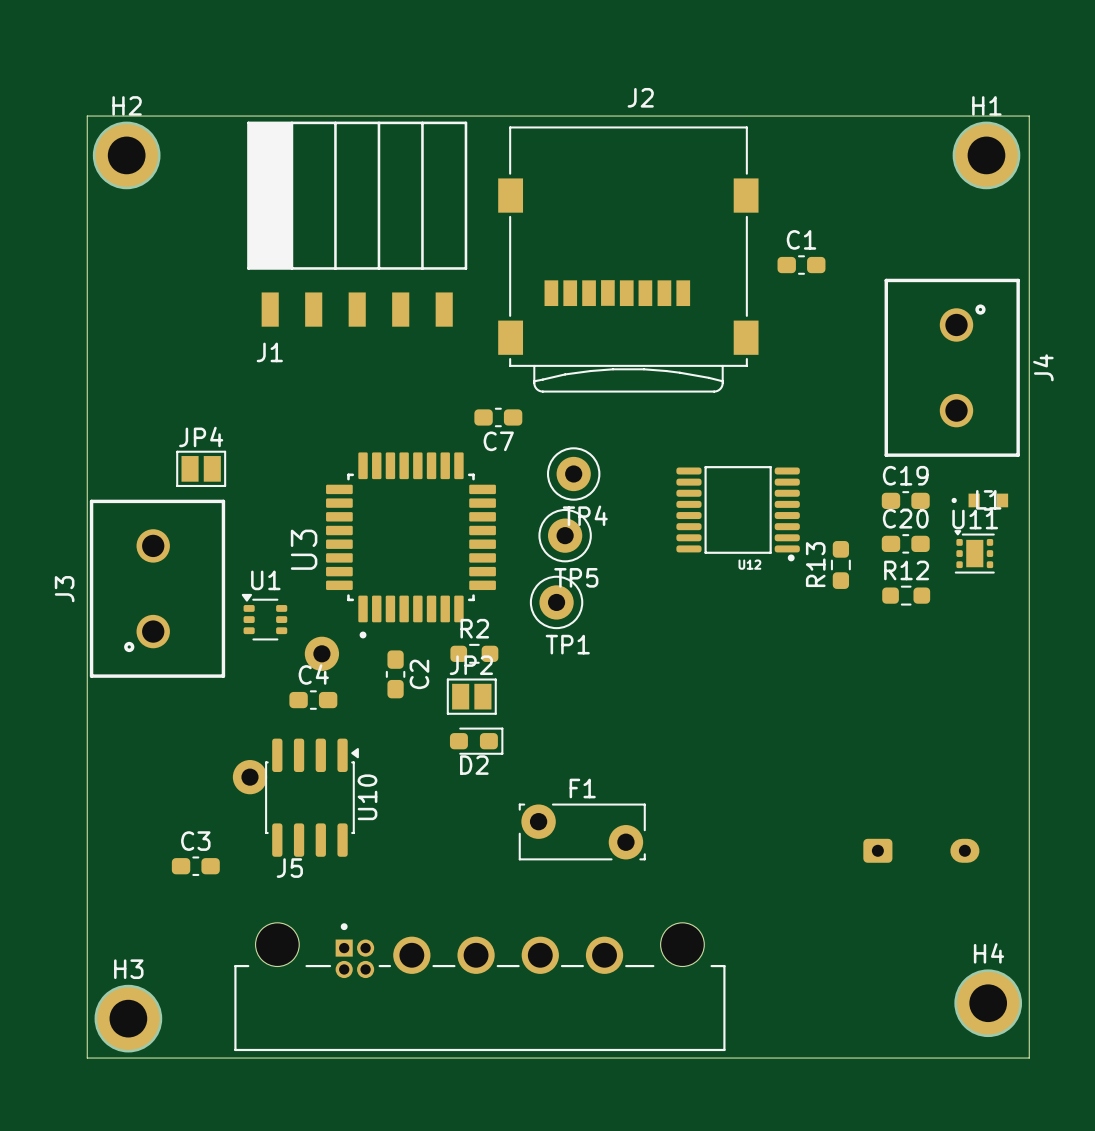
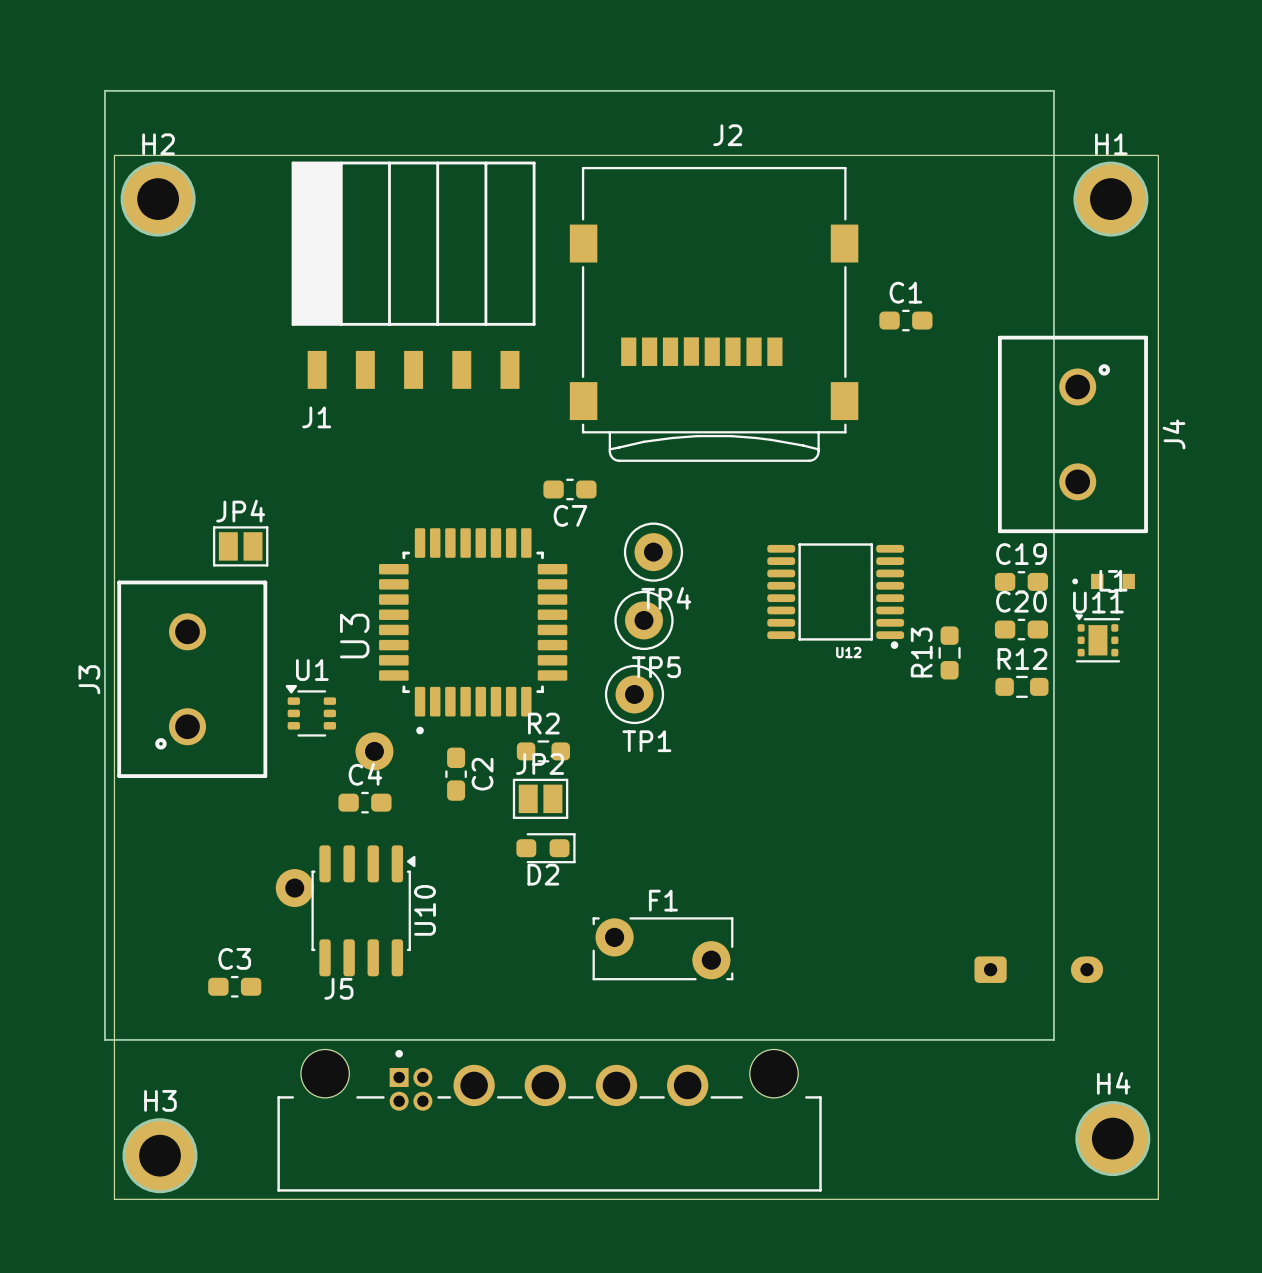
line: none -> (104, 90) (1053, 90) (1053, 1039) (104, 1039) (104, 90)

